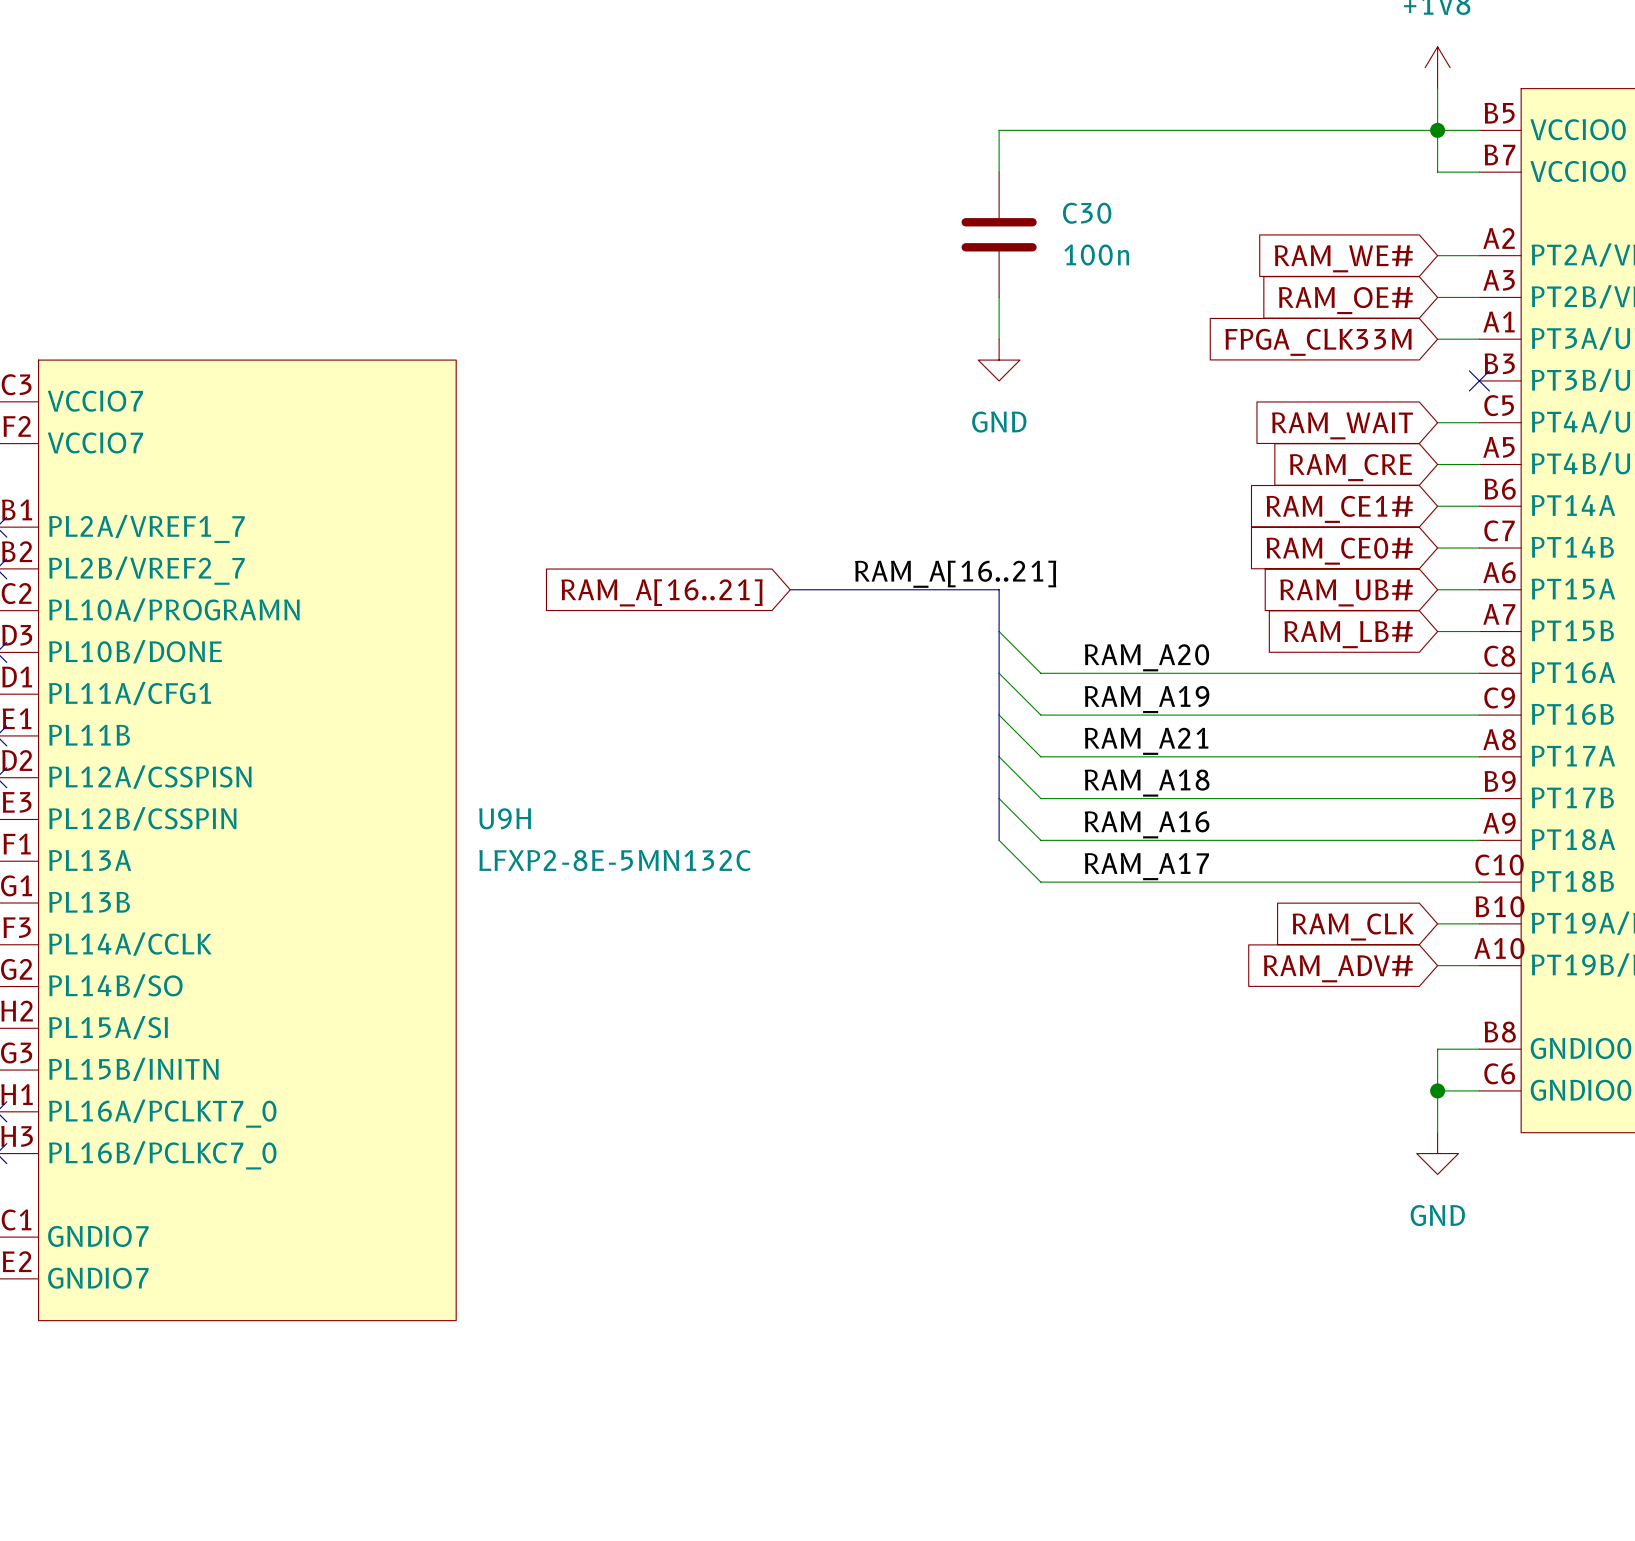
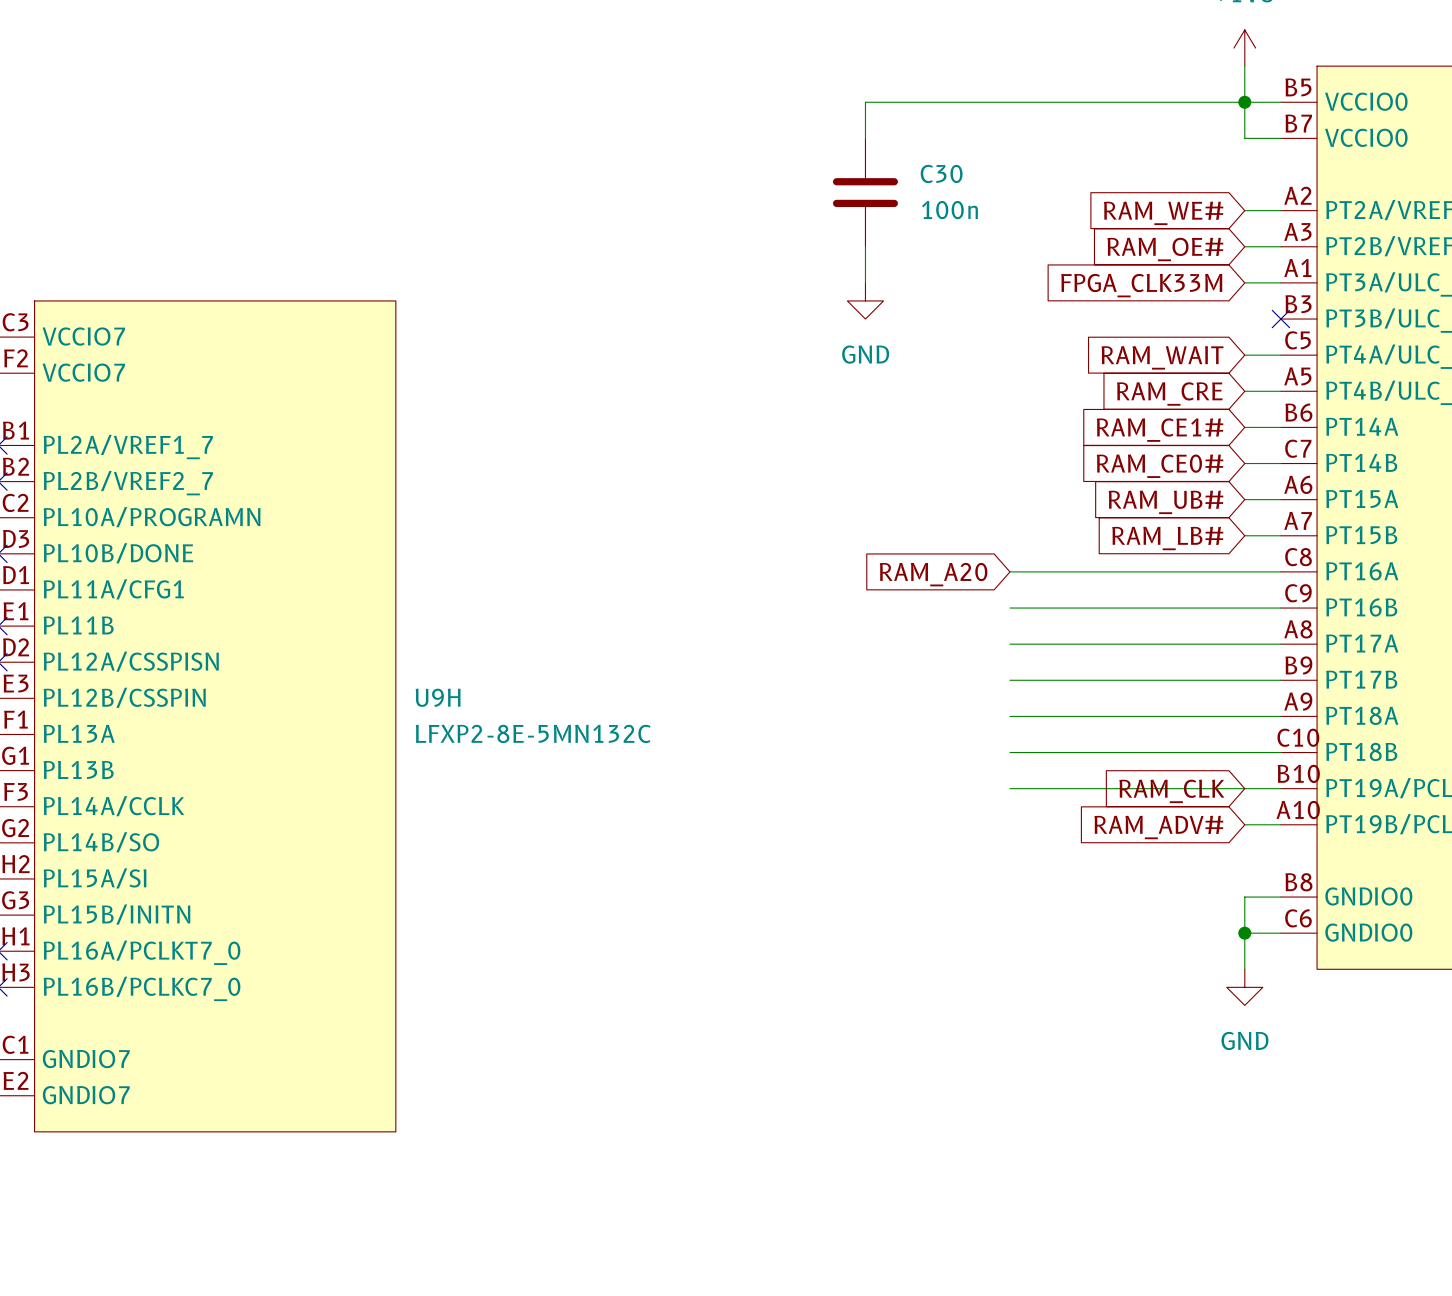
label: RAM_A[16..21] (955, 574) -> none
bus: (790, 589) (999, 589) (999, 840) -> none
global label: RAM_A[16..21] (662, 592) -> none
wire: (999, 631) (1040, 673) (1166, 673) -> none
label: RAM_A20 (1146, 657) -> none
wire: (999, 673) (1040, 715) (1166, 715) -> none
global label: none -> RAM_A20 (933, 574)
label: RAM_A19 (1147, 699) -> none
wire: (999, 715) (1040, 756) (1166, 756) -> none
label: RAM_A21 (1146, 741) -> none
wire: (999, 756) (1040, 798) (1166, 798) -> none
label: RAM_A18 (1147, 783) -> none
wire: (999, 798) (1040, 840) (1166, 840) -> none
label: RAM_A16 (1147, 824) -> none
wire: (999, 840) (1040, 882) (1166, 882) -> none
label: RAM_A17 (1146, 866) -> none
wire: none -> (1009, 788) (1244, 788)

